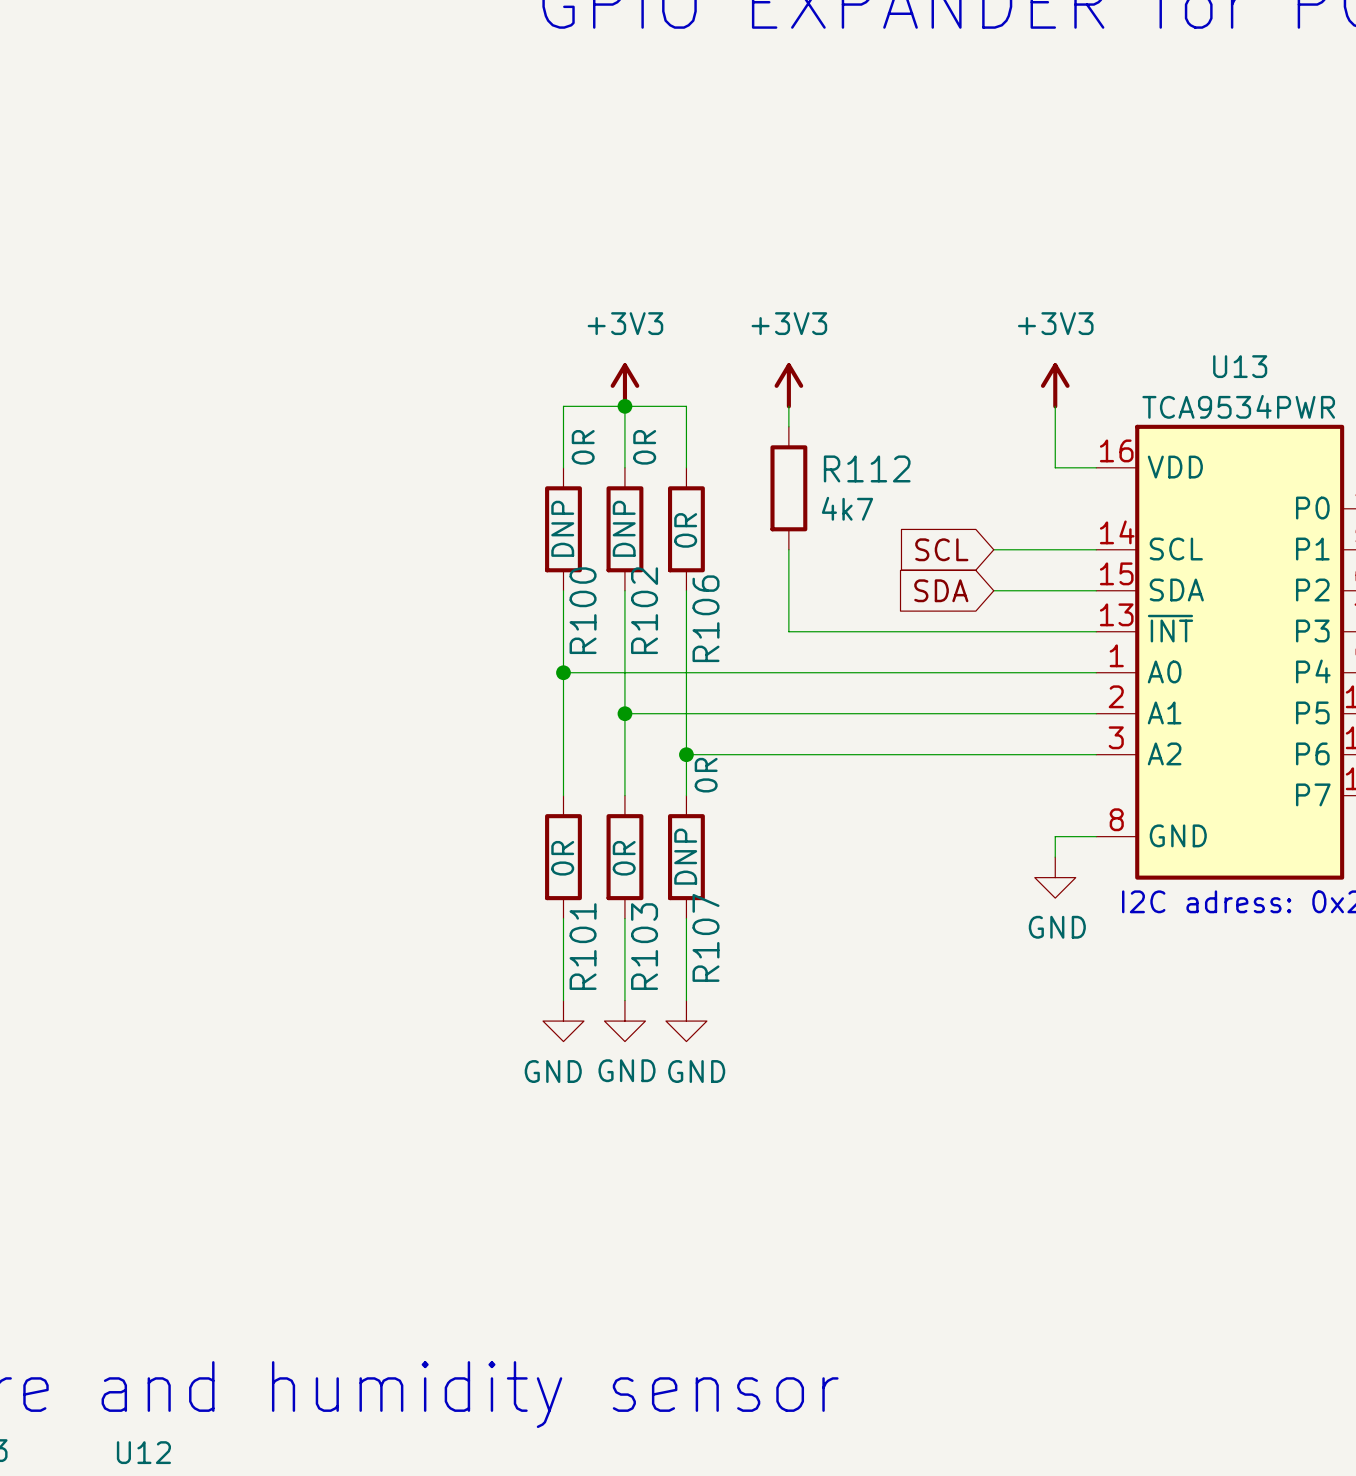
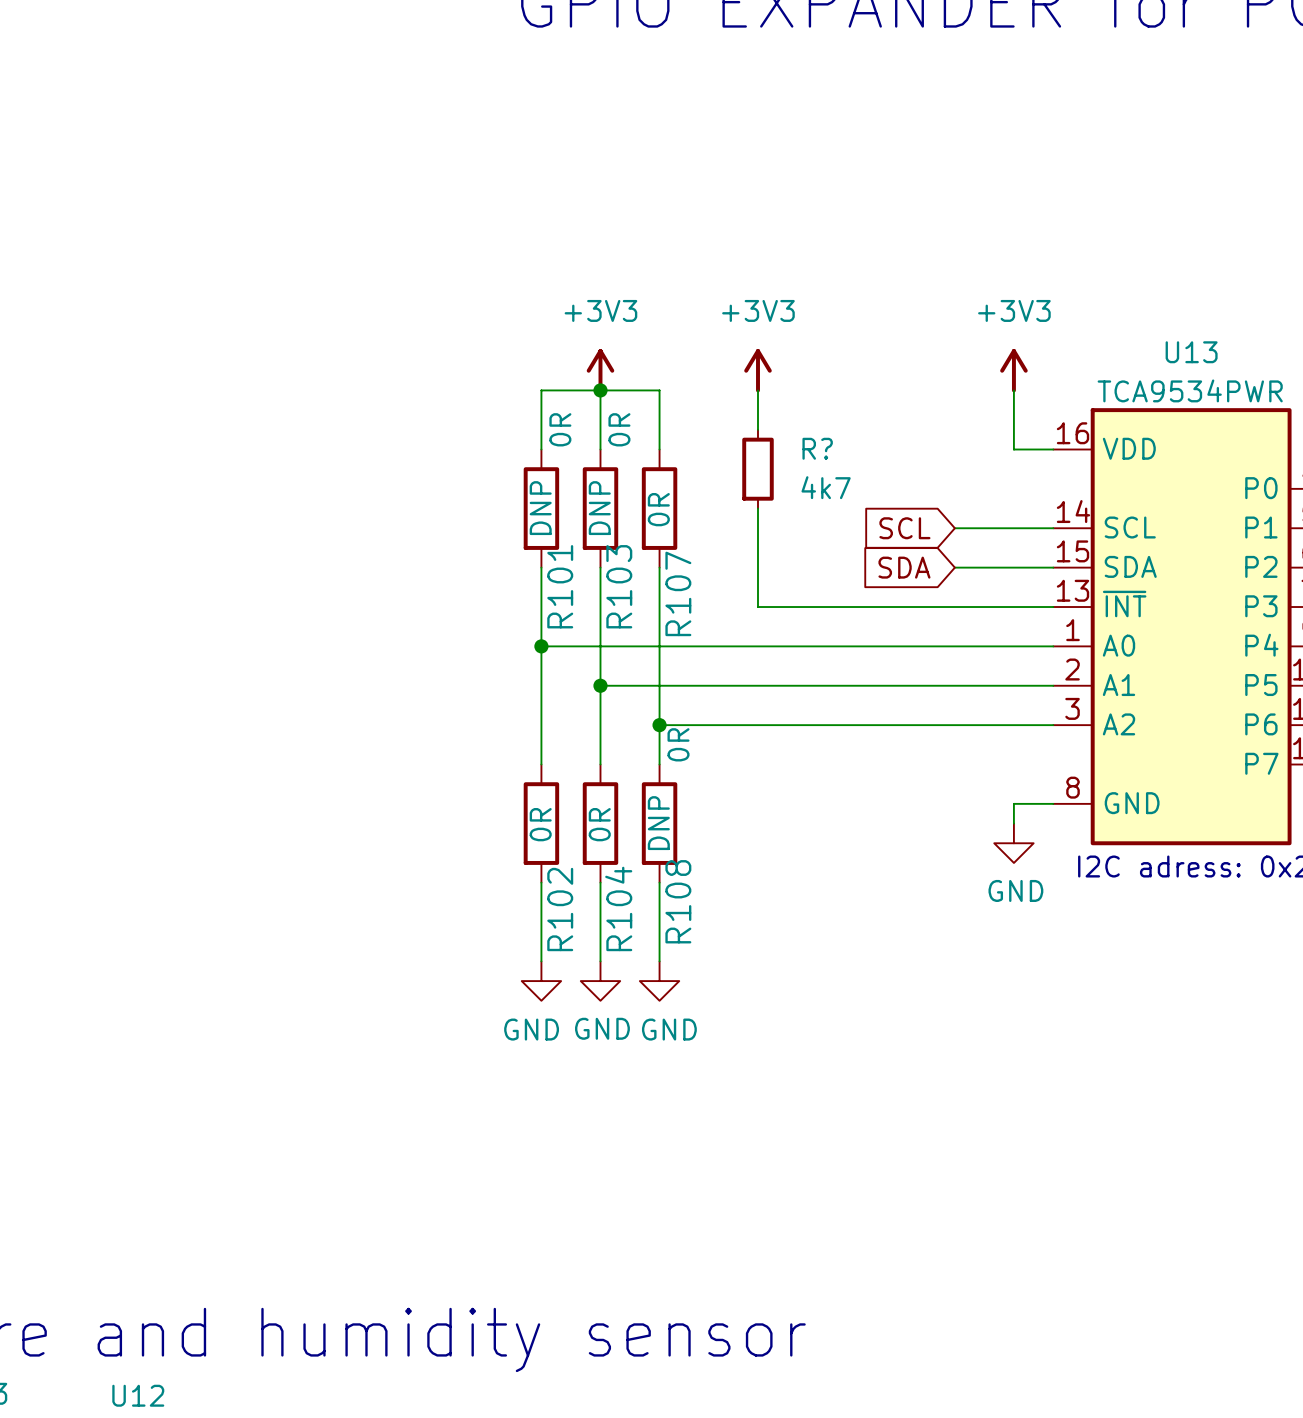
R112: (788, 488) -> none
R?: none -> (757, 469)
R100 name: R100 (583, 610) -> R101 (560, 586)
R102 name: R102 (644, 610) -> R103 (619, 586)
R106 name: R106 (706, 618) -> R107 (678, 593)
R107 name: R107 (706, 937) -> R108 (678, 901)
R101 name: R101 (583, 946) -> R102 (560, 909)
R103 name: R103 (644, 946) -> R104 (618, 908)

